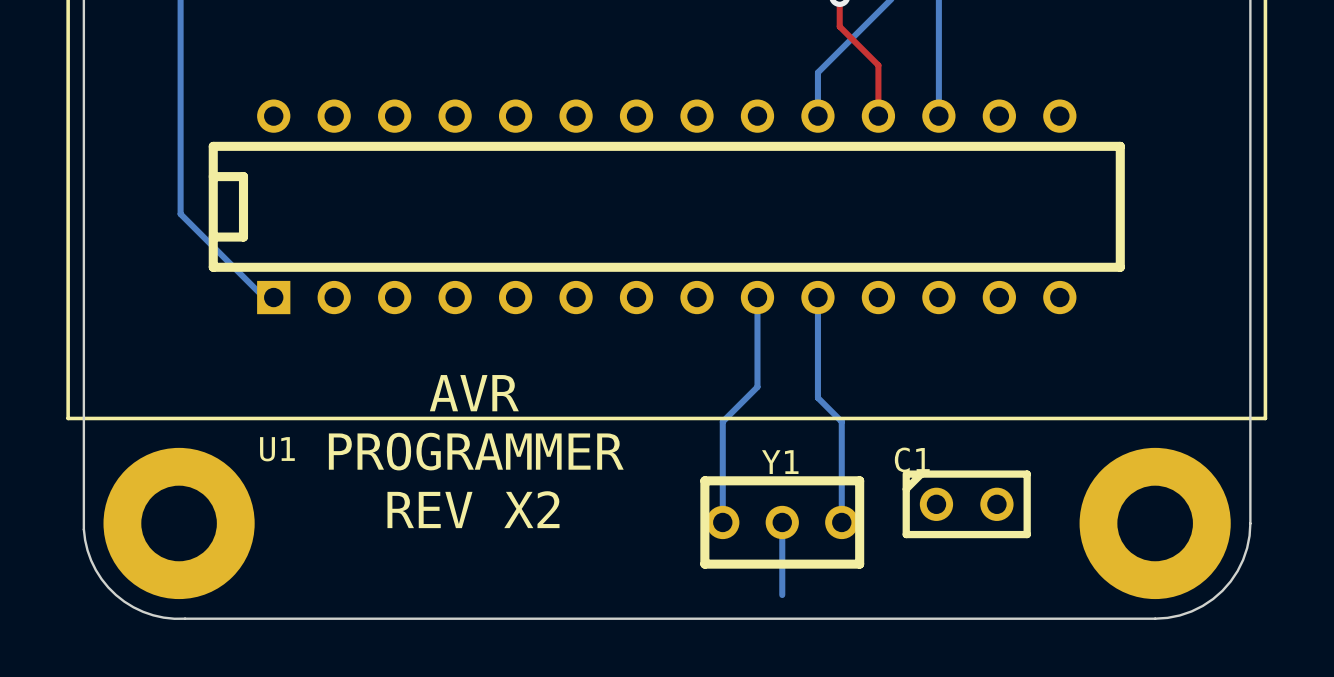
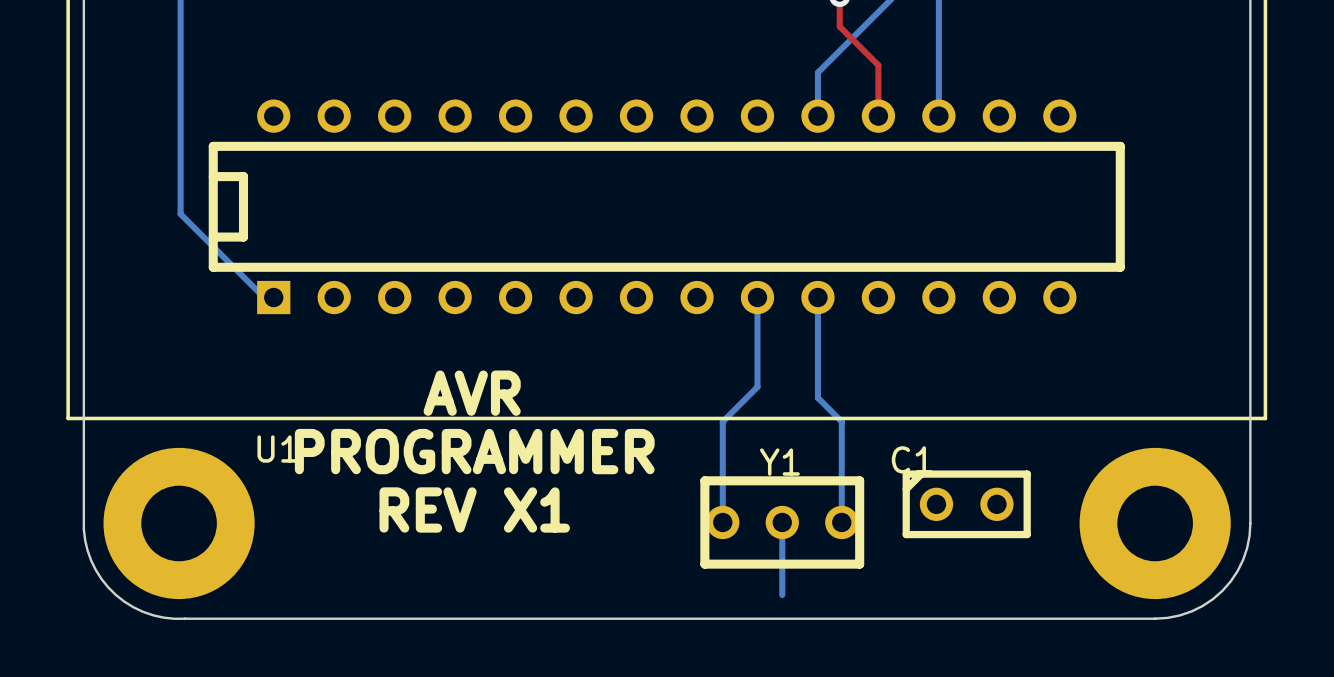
text: REV X2 (473, 509) -> REV X1 (474, 509)

